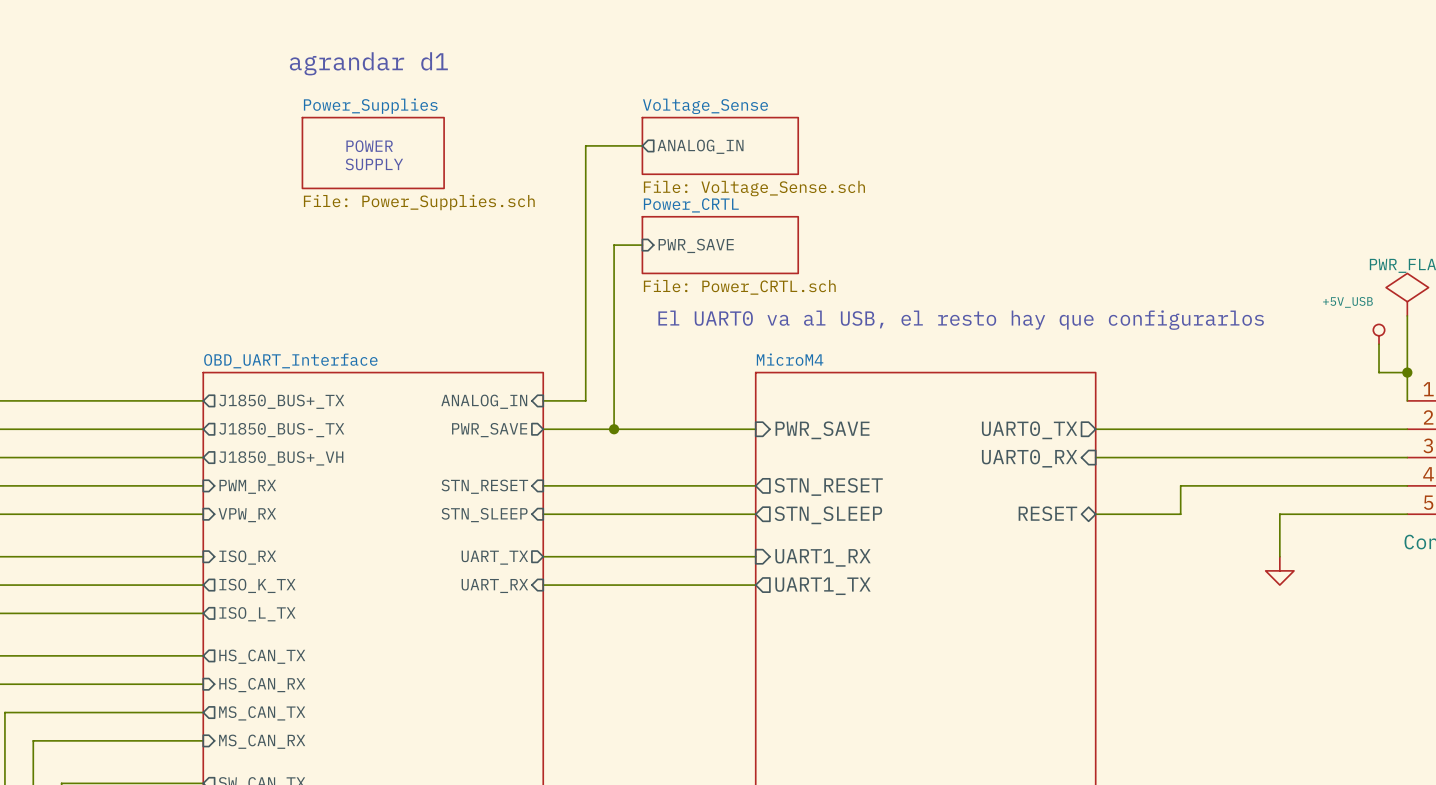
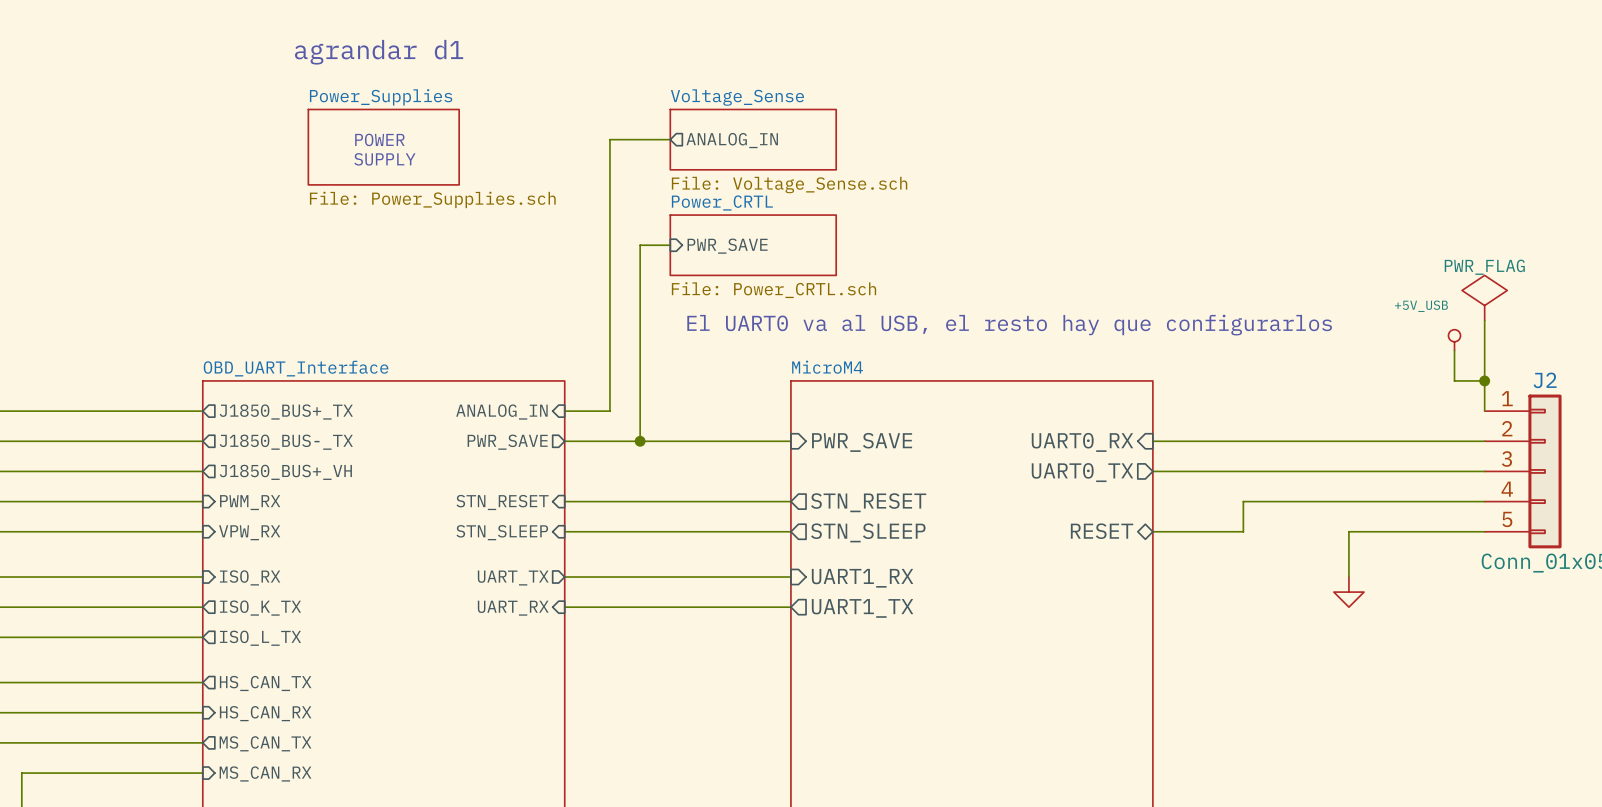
sheet pin shape: output (1029, 430) -> input (1082, 442)
sheet pin: UART0_TX (1029, 430) -> UART0_RX (1082, 442)
sheet pin shape: input (1029, 458) -> output (1082, 472)
sheet pin: UART0_RX (1029, 458) -> UART0_TX (1082, 472)

